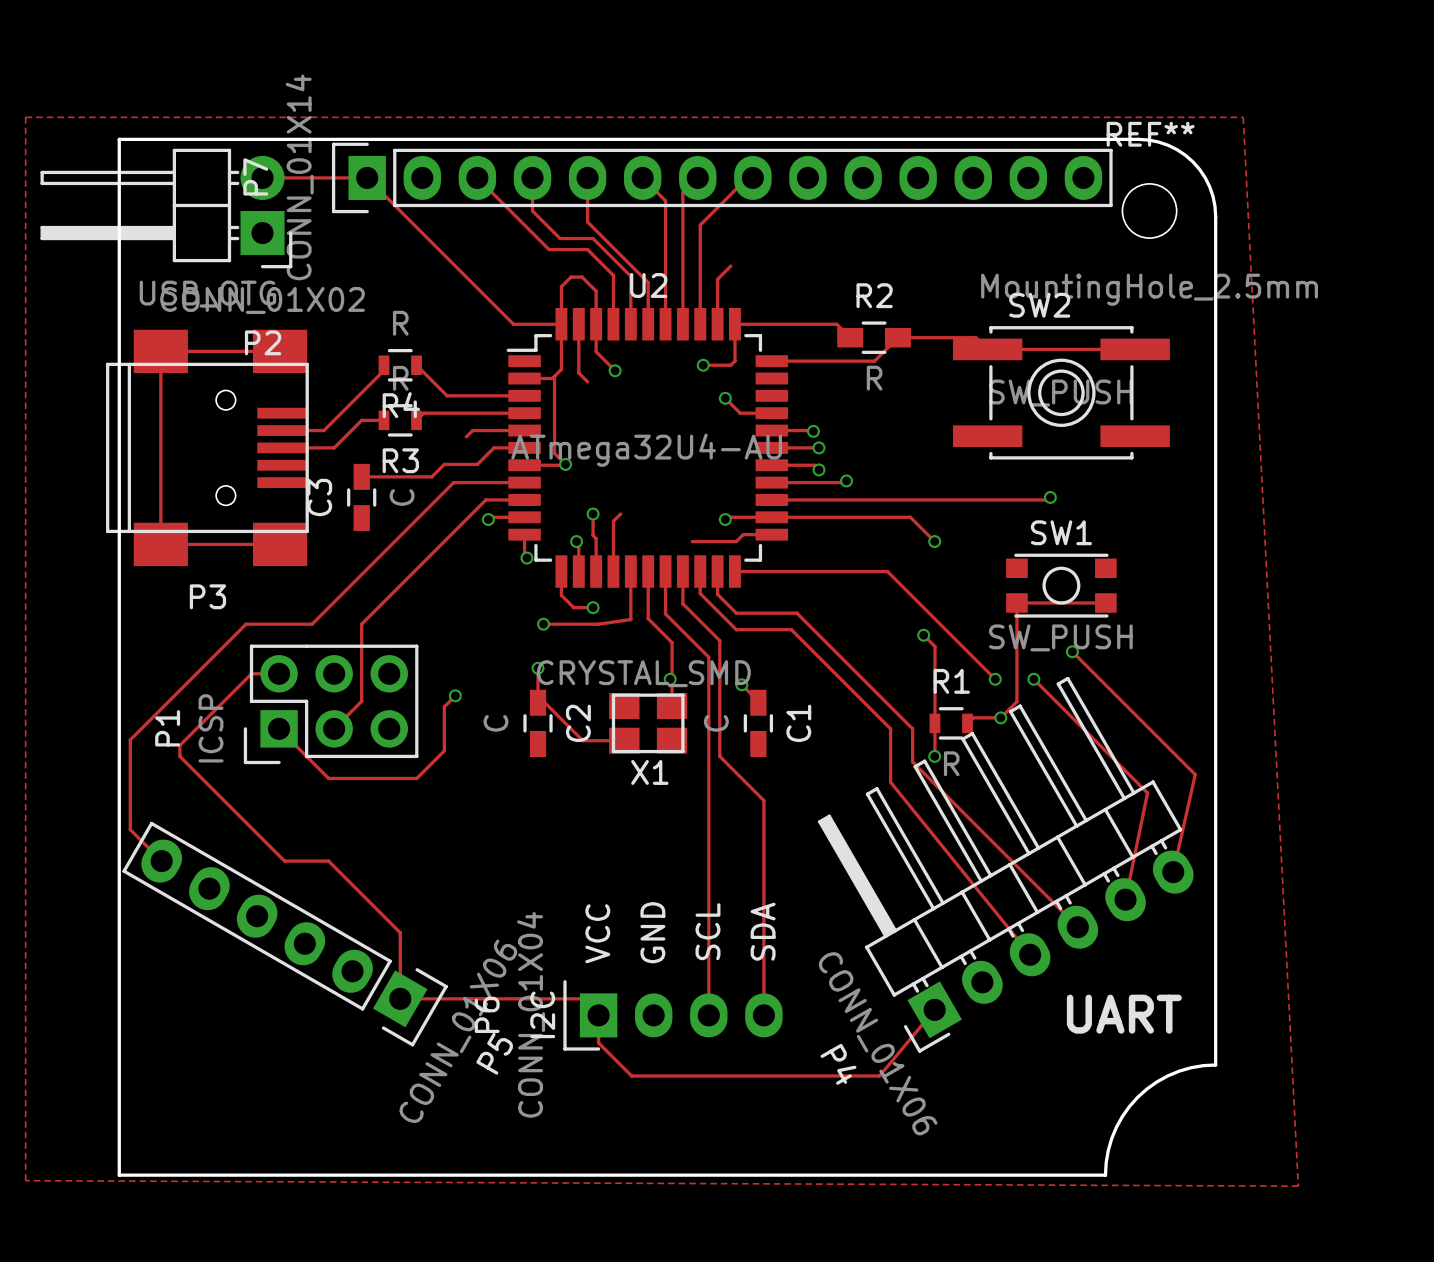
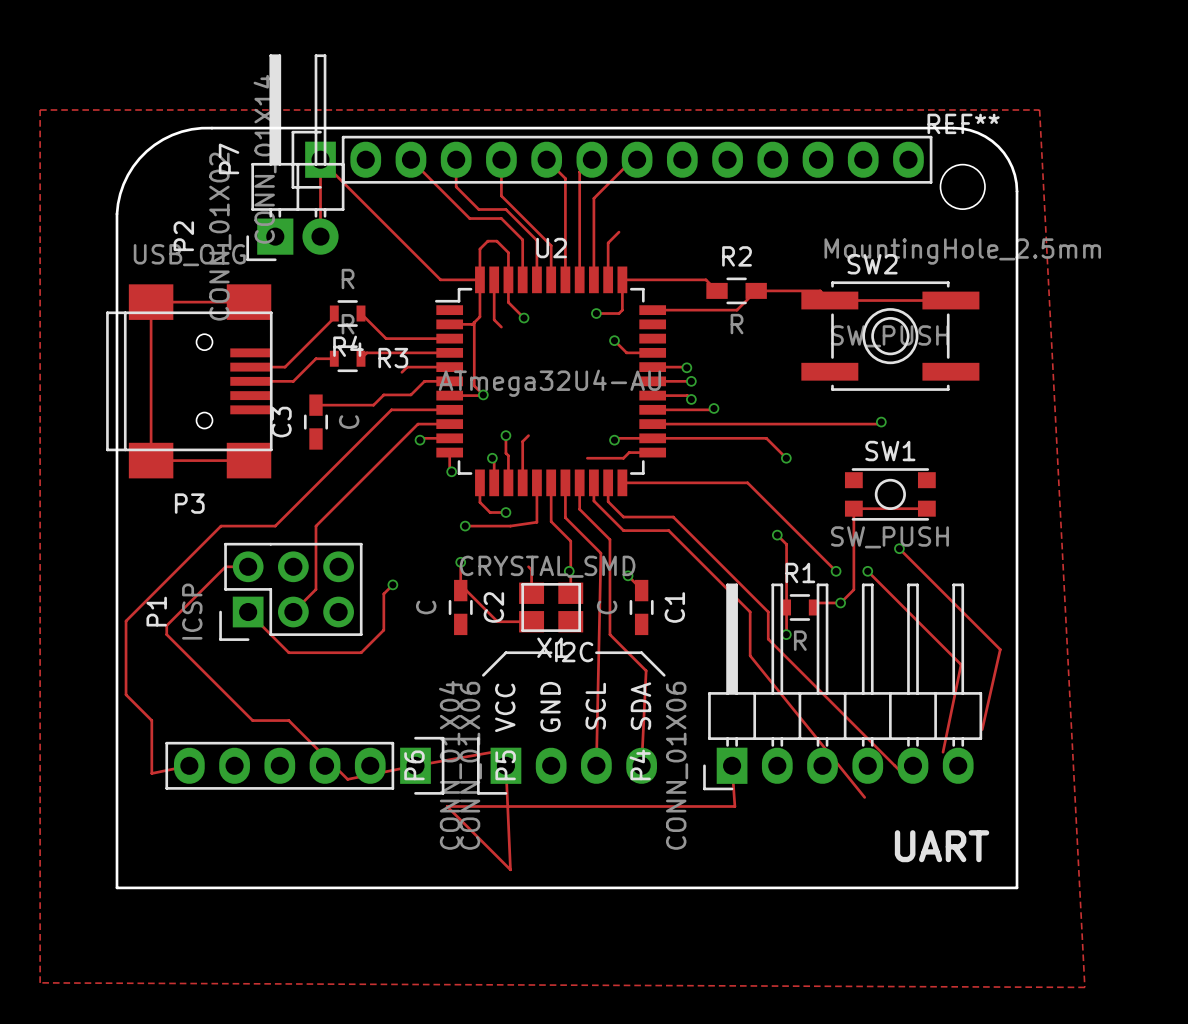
board edge: (234, 139) (119, 139) (119, 244) -> (211, 128) (191, 129) (172, 135) (146, 151) (127, 175) (120, 194) (116, 214)
track: (262, 177) (367, 177) -> (320, 236) (320, 159)
P2 rotation: 0° (166, 208) -> 90° clockwise (295, 157)
P2 position: (166, 208) -> (295, 157)
R3 name position: R3 (400, 460) -> R3 (393, 358)
track: (708, 657) (708, 1015) -> (600, 553) (596, 765)
track: none -> (528, 566) (531, 569) (531, 593)
track: (763, 800) (763, 1015) -> (646, 670) (641, 765)
track: none -> (151, 720) (151, 773) (189, 765)
P4 rotation: 0° (1005, 864) -> 30° clockwise (842, 686)
track: (400, 932) (400, 998) (582, 998) (598, 1015) (598, 1042) (631, 1075) (879, 1075) (934, 1009) -> (347, 779) (492, 752) (505, 765) (510, 869) (447, 806) (734, 806) (732, 765)
P5 rotation: 0° (285, 934) -> 30° counterclockwise (304, 765)
P6 footprint: [563, 980, 783, 1051] -> [477, 651, 666, 795]
P6 name position: P6 (487, 1014) -> P6 (414, 765)
P6 value position: CONN_01X04 (531, 1014) -> CONN_01X04 (450, 765)
board edge: (119, 1064) (119, 1175) (1105, 1175) (1108, 1150) (1116, 1127) (1137, 1097) (1157, 1081) (1179, 1071) (1215, 1064) -> (116, 887) (1017, 887)

